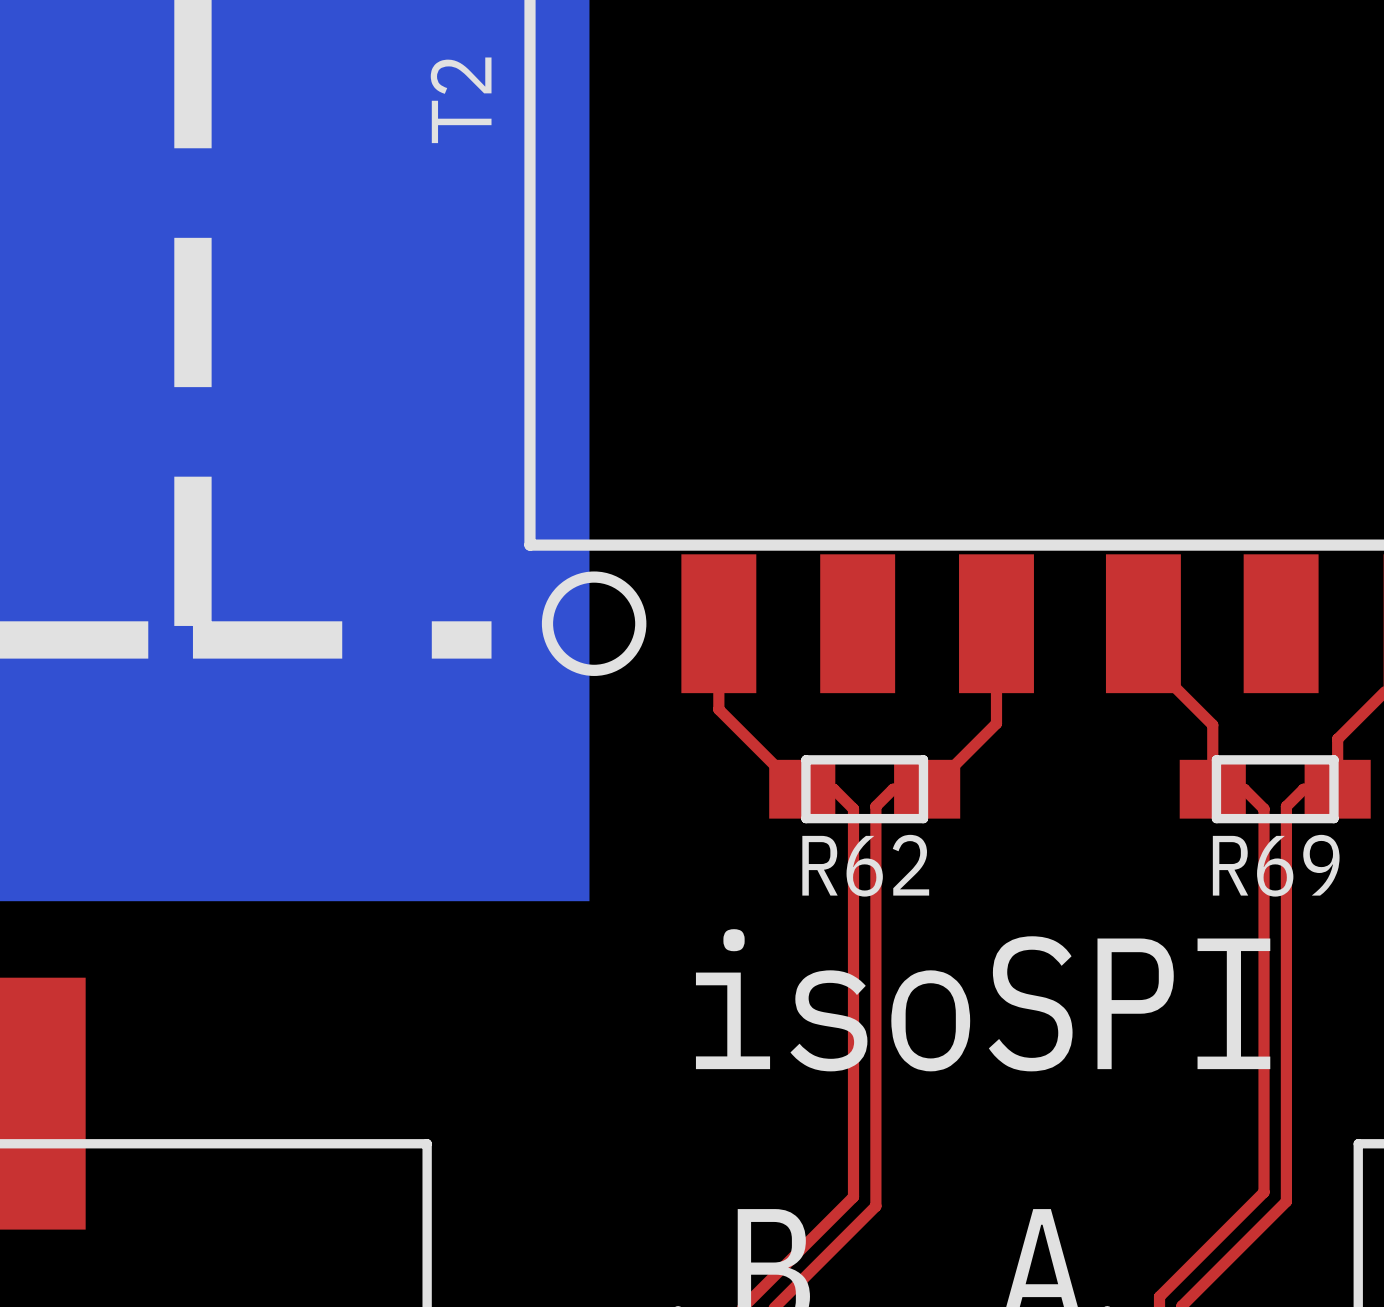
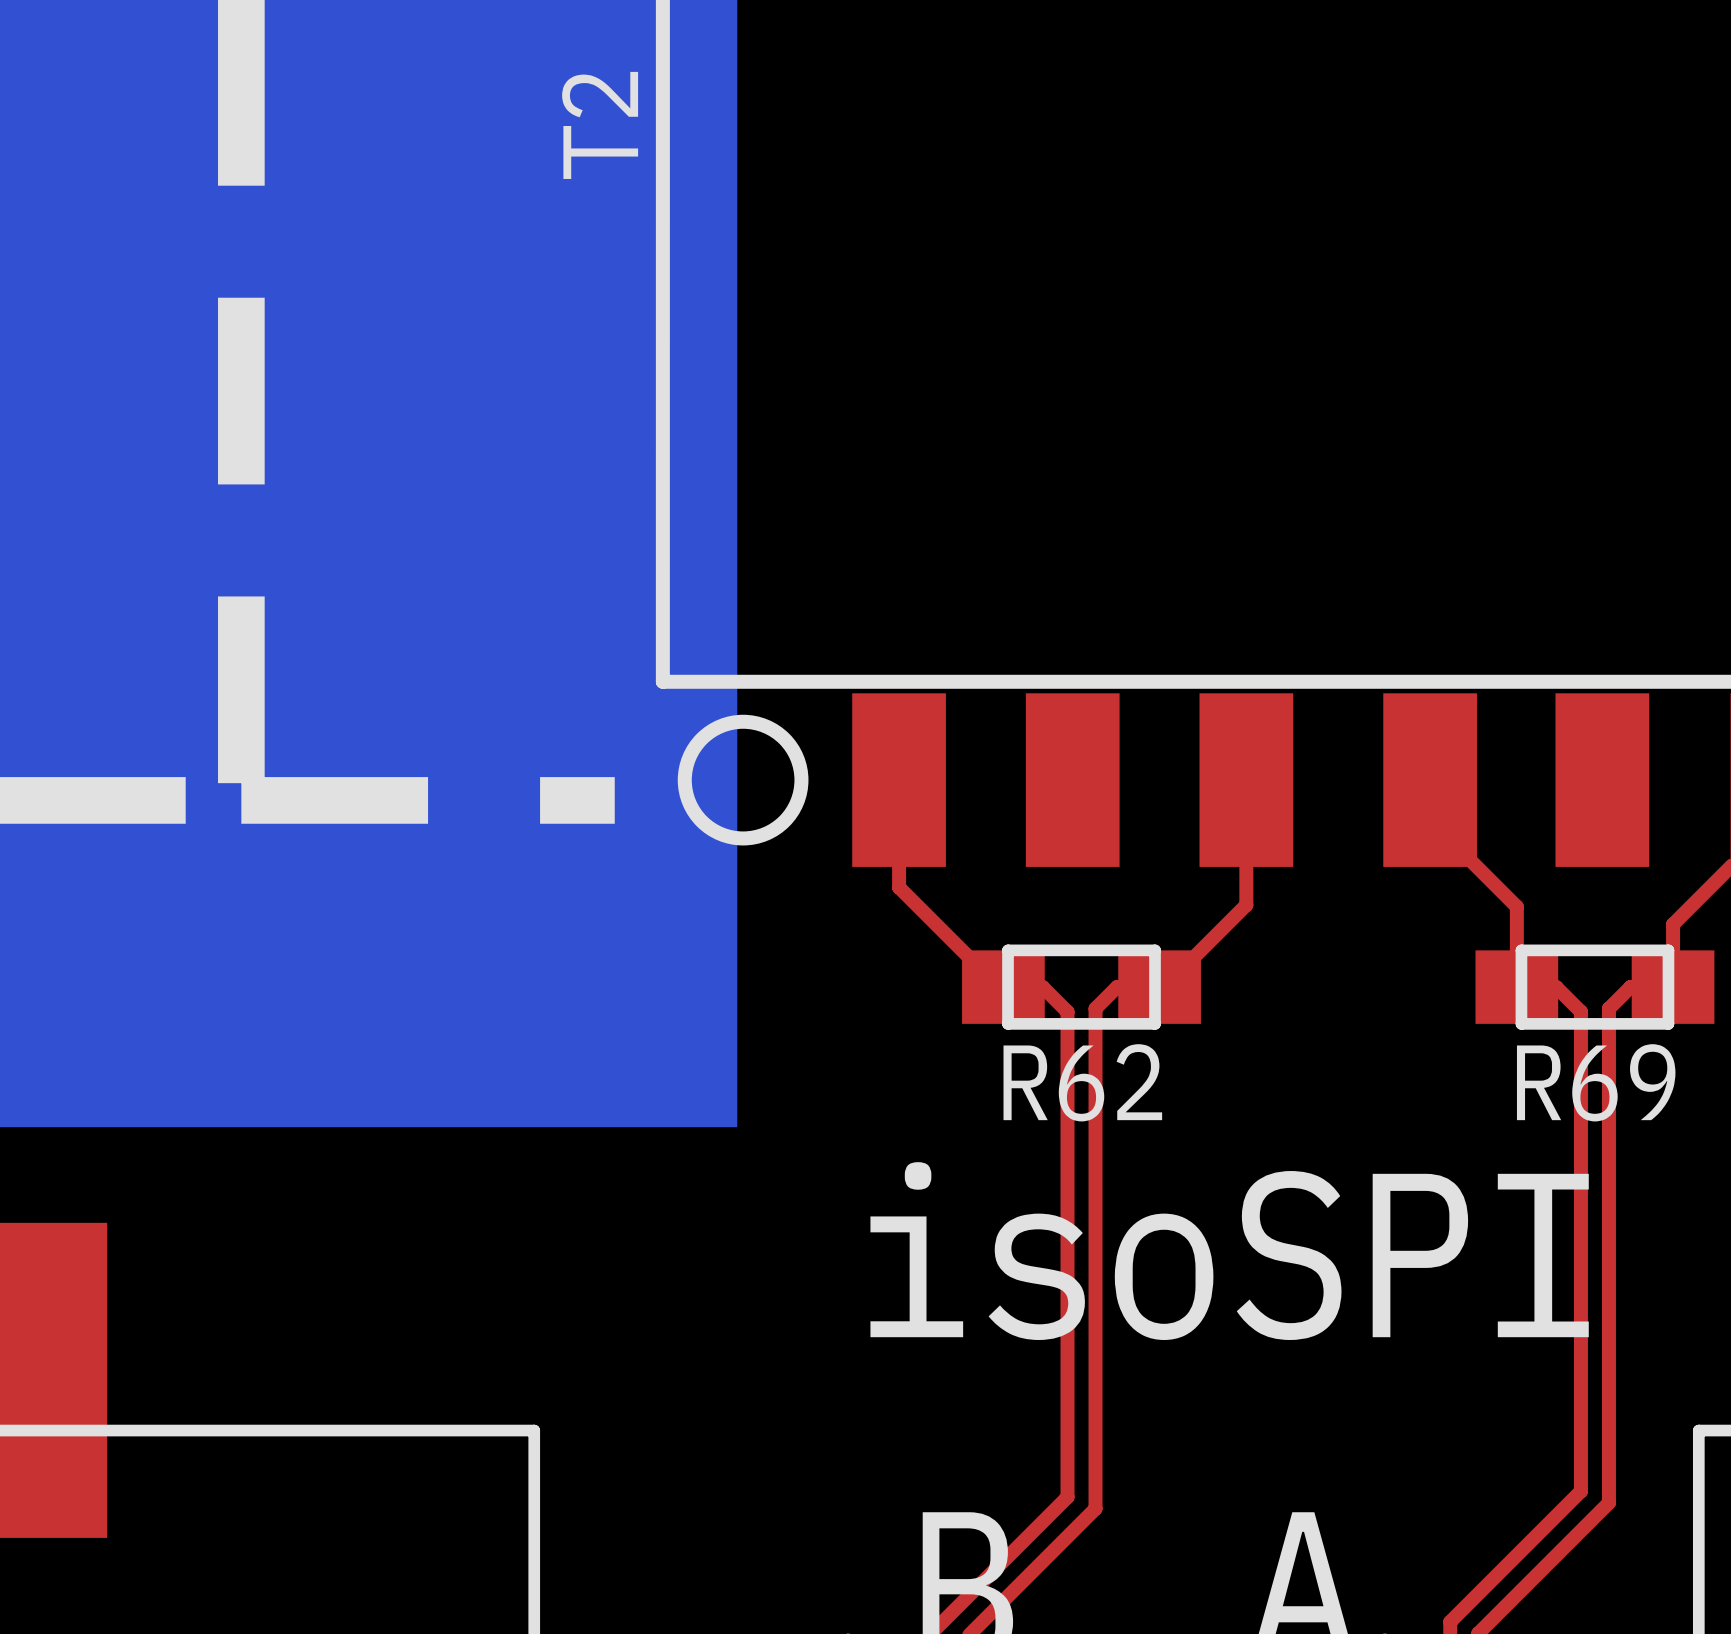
T2 name position: T2 (461, 100) -> T2 (600, 125)

